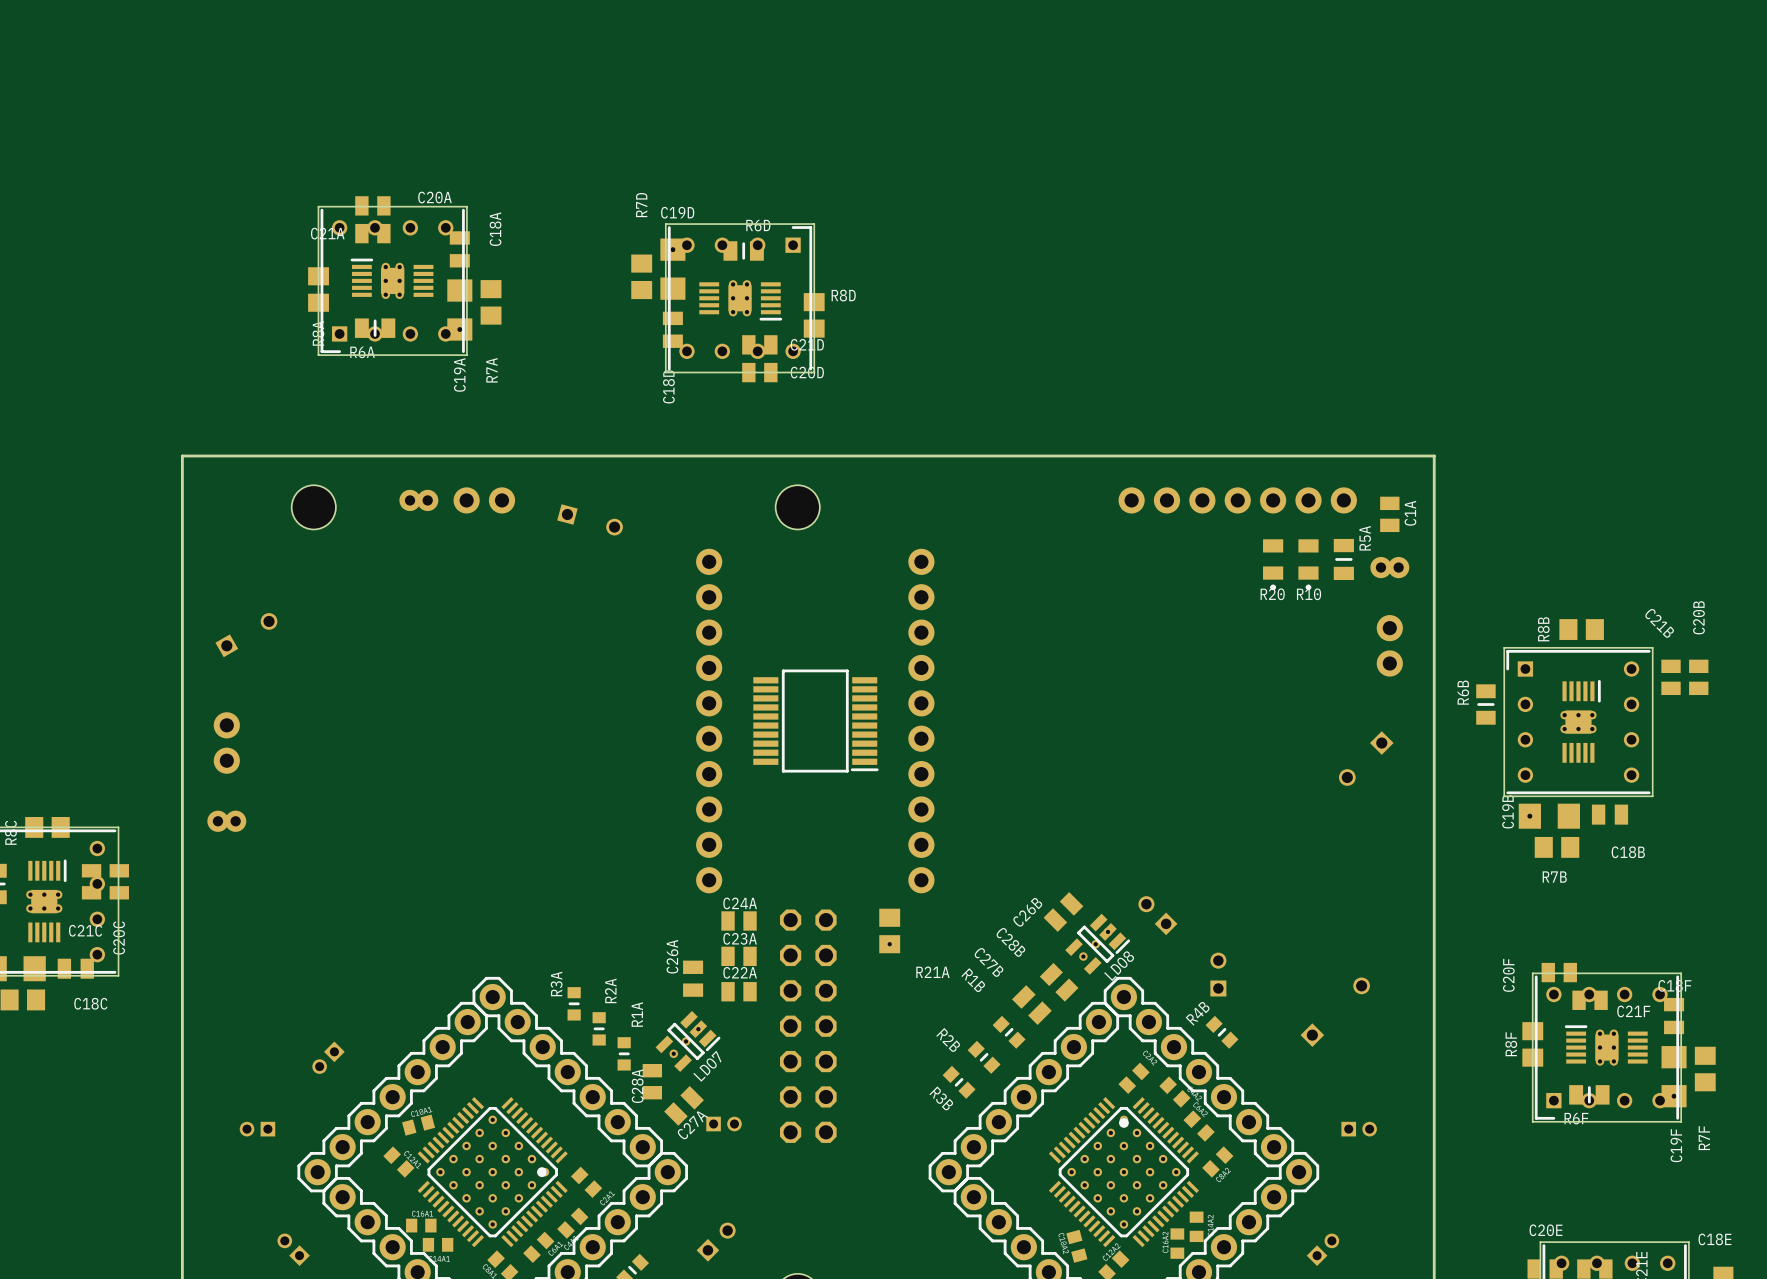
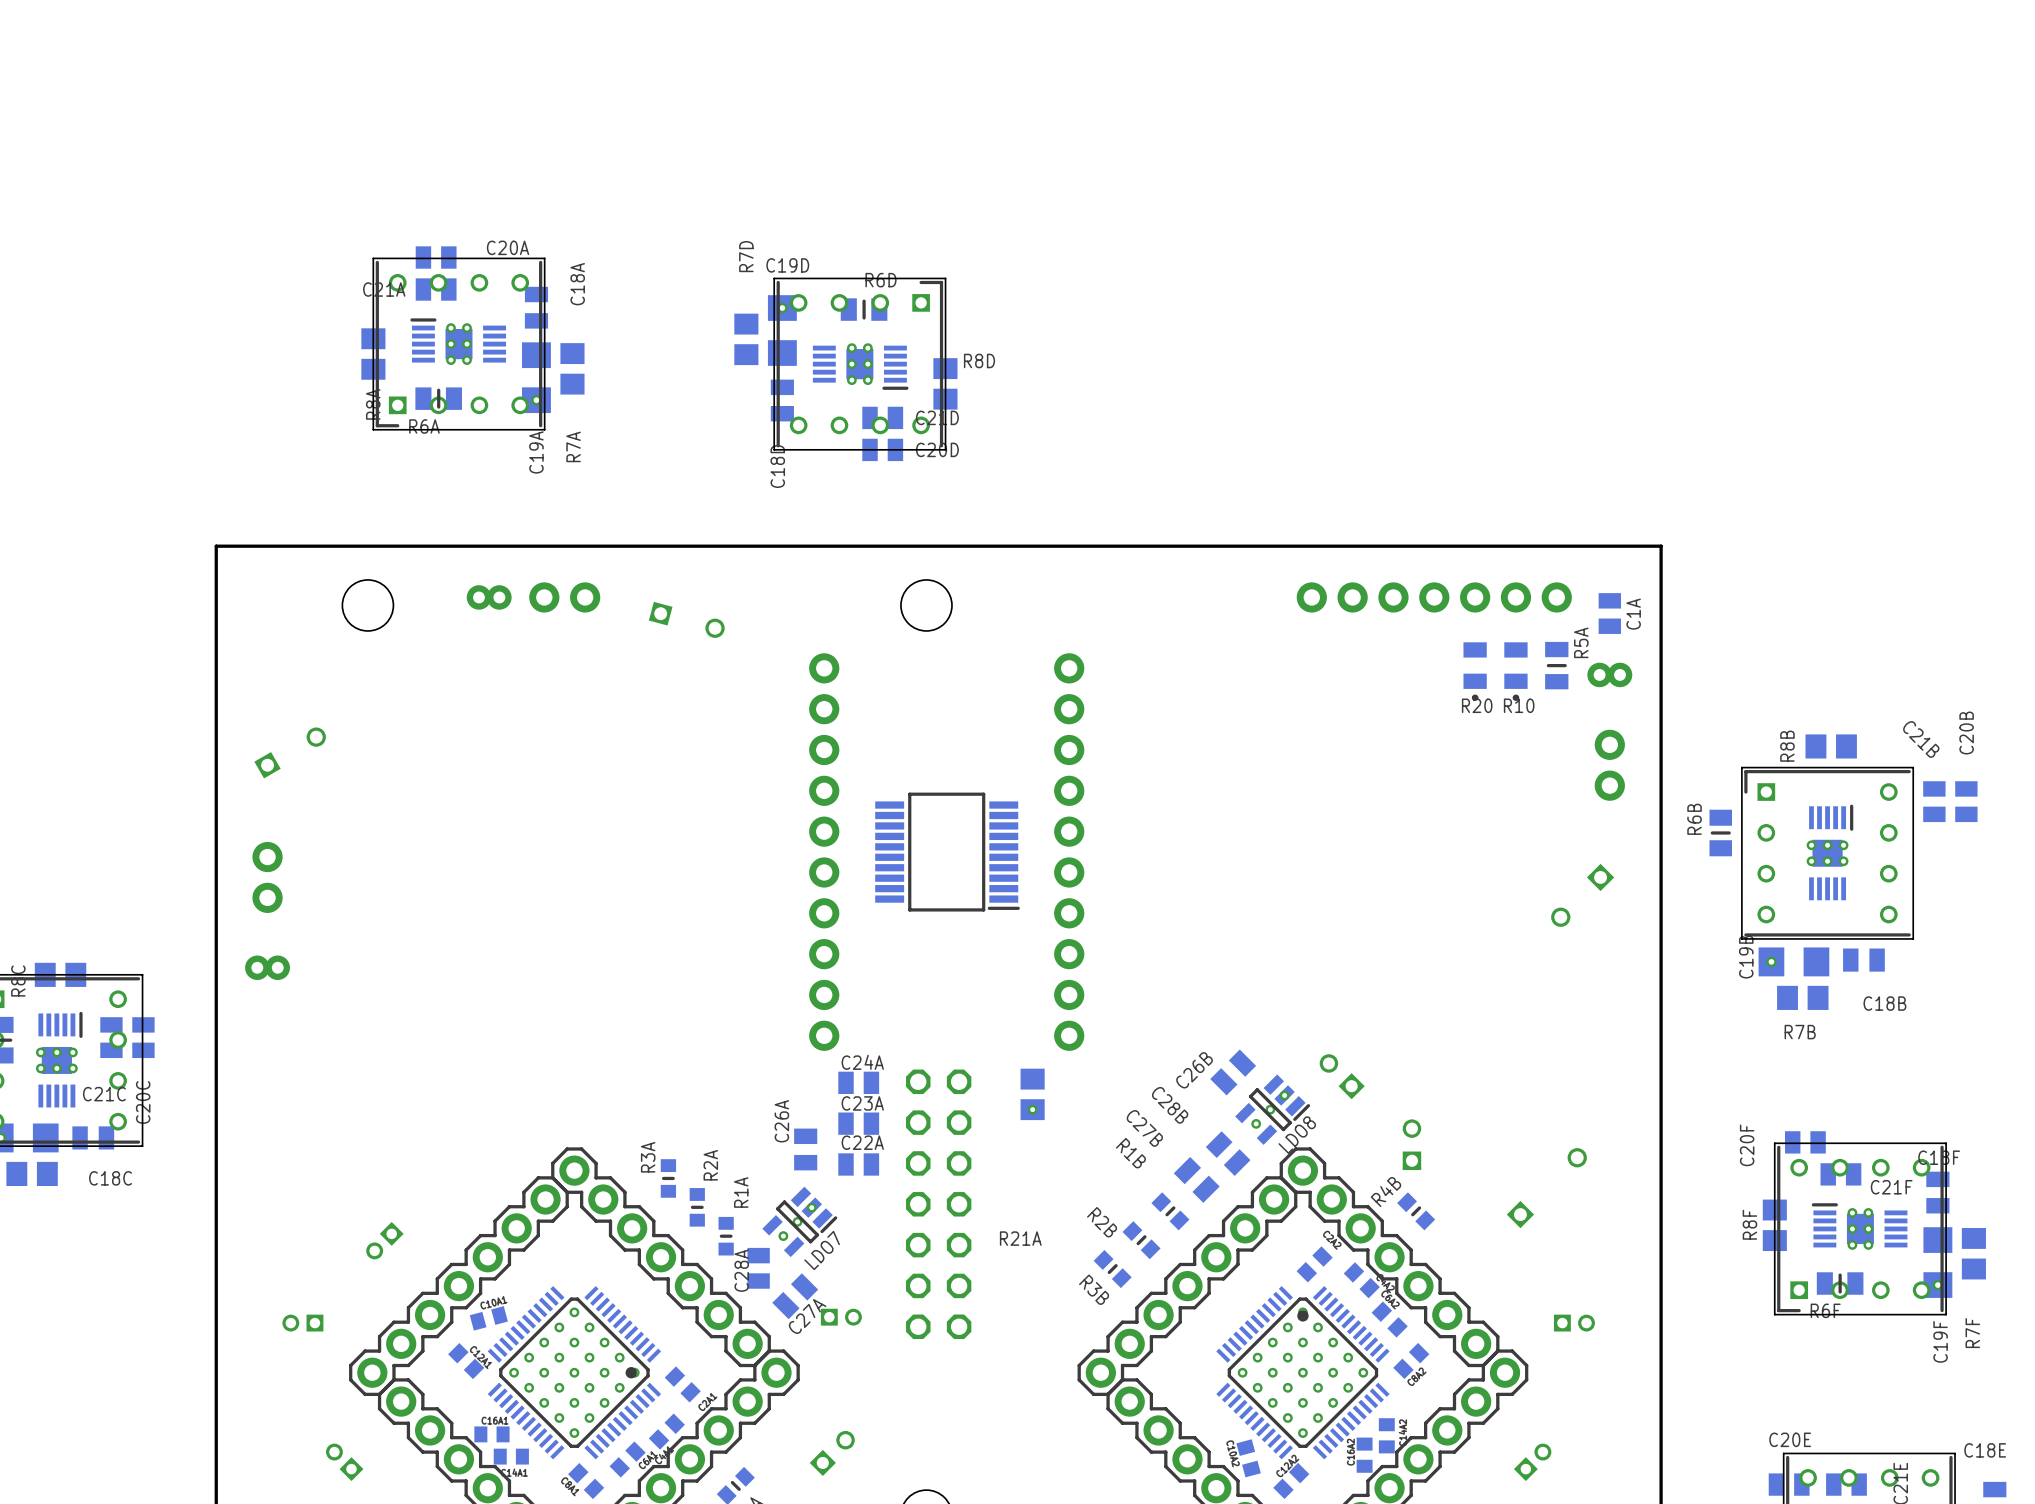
R21A name position: R21A (932, 972) -> R21A (1020, 1238)

